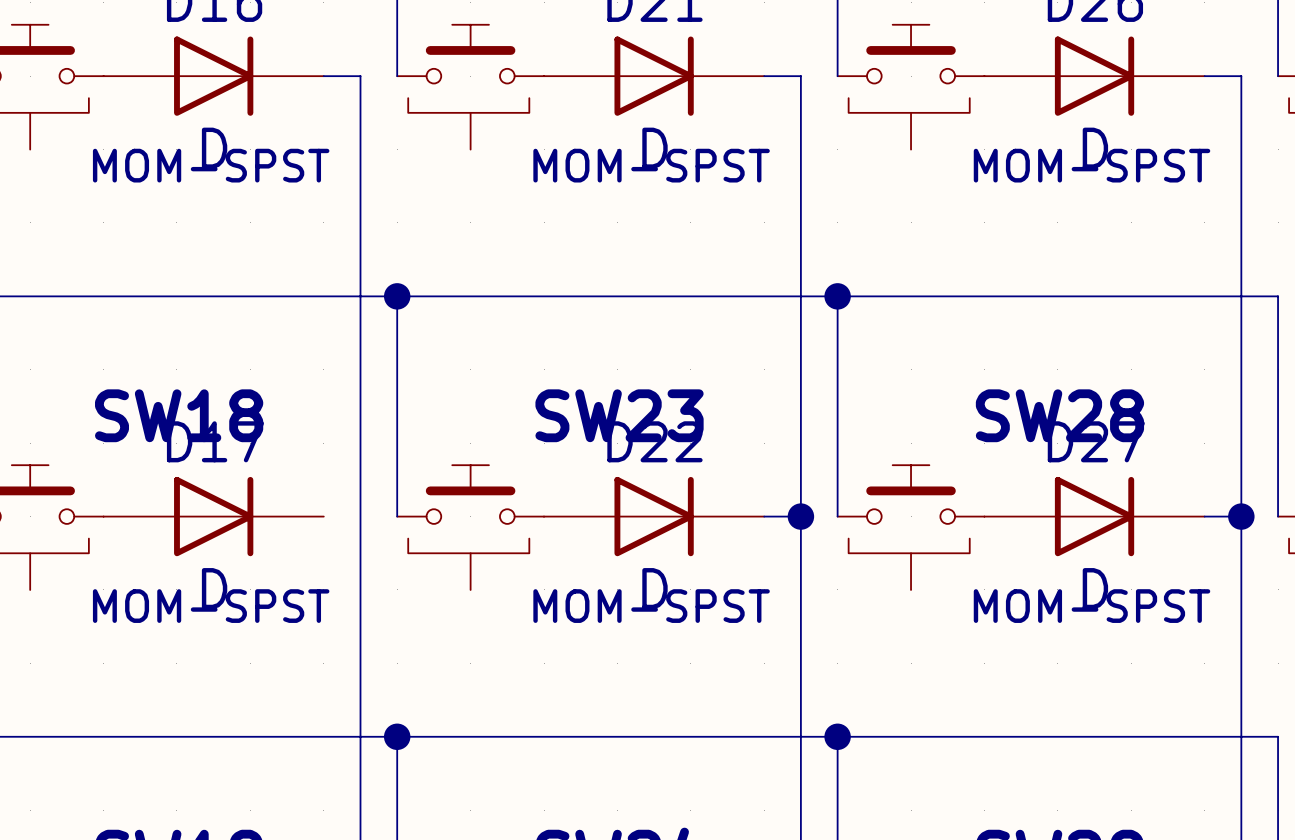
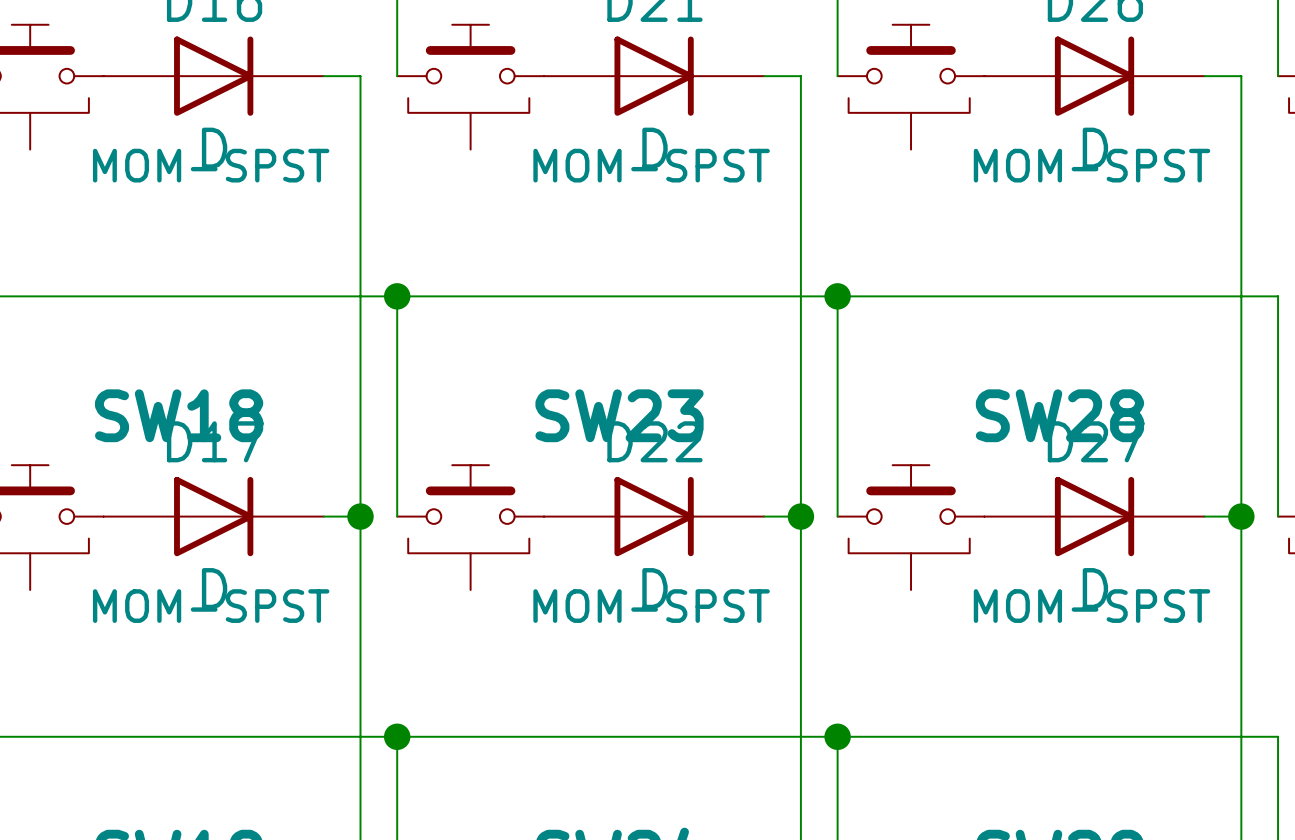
wire: none -> (323, 516) (360, 516)
junction: none -> (360, 516)

